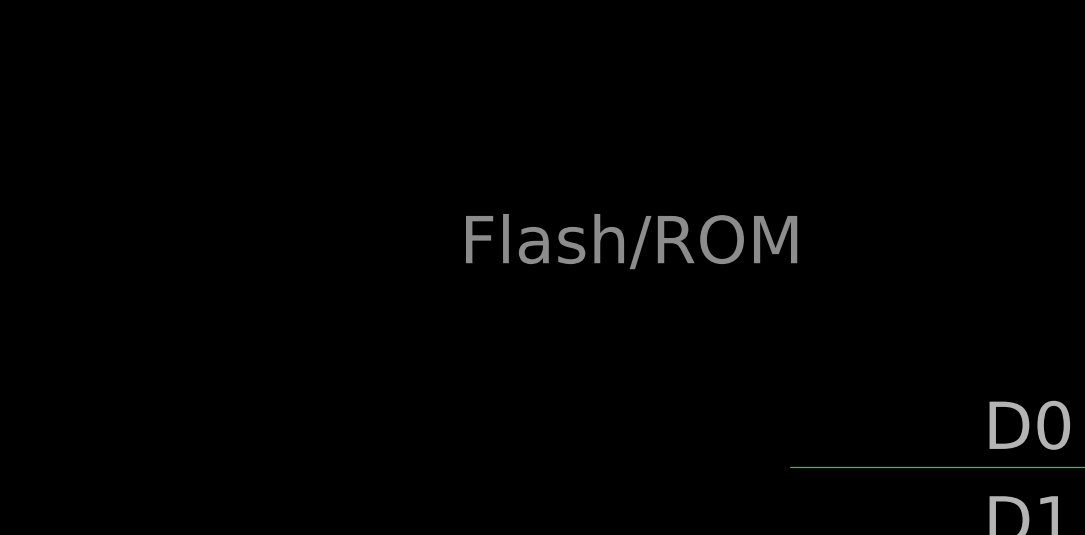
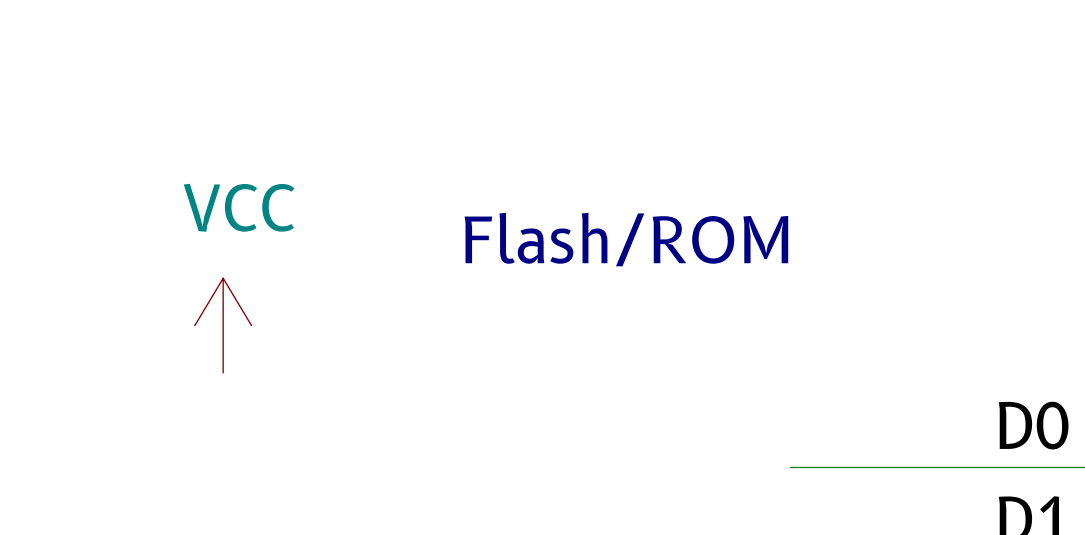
power symbol: none -> VCC (223, 325)

